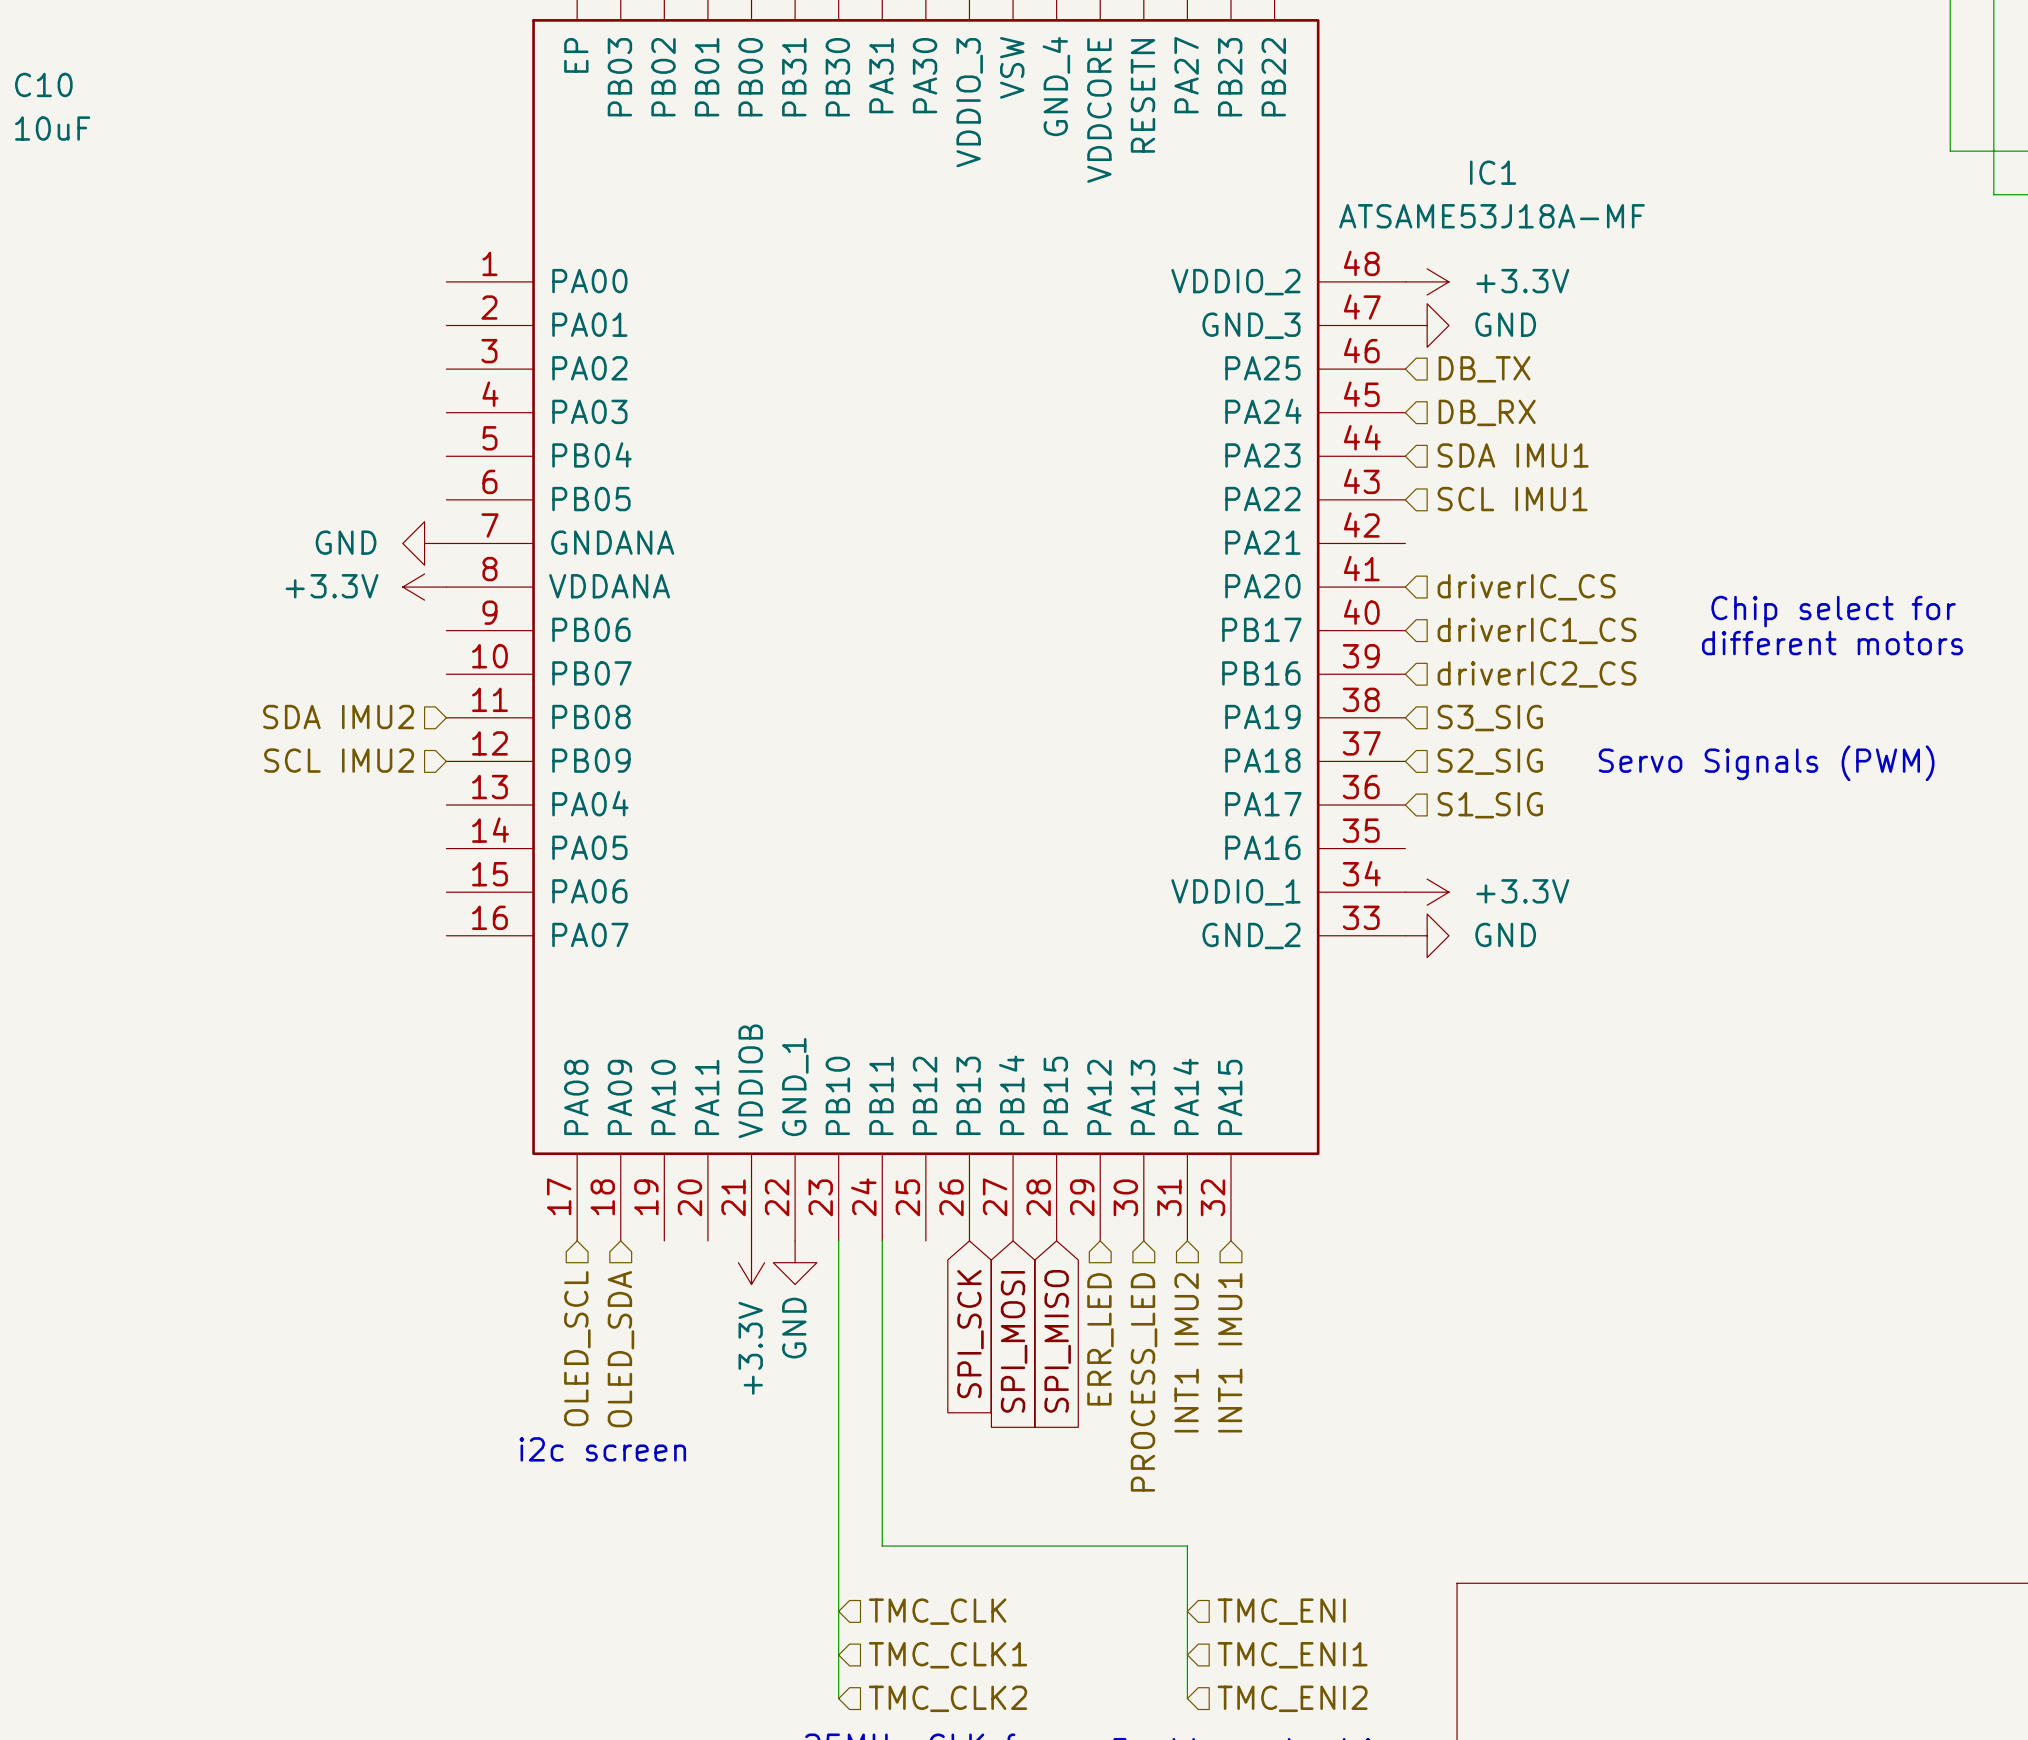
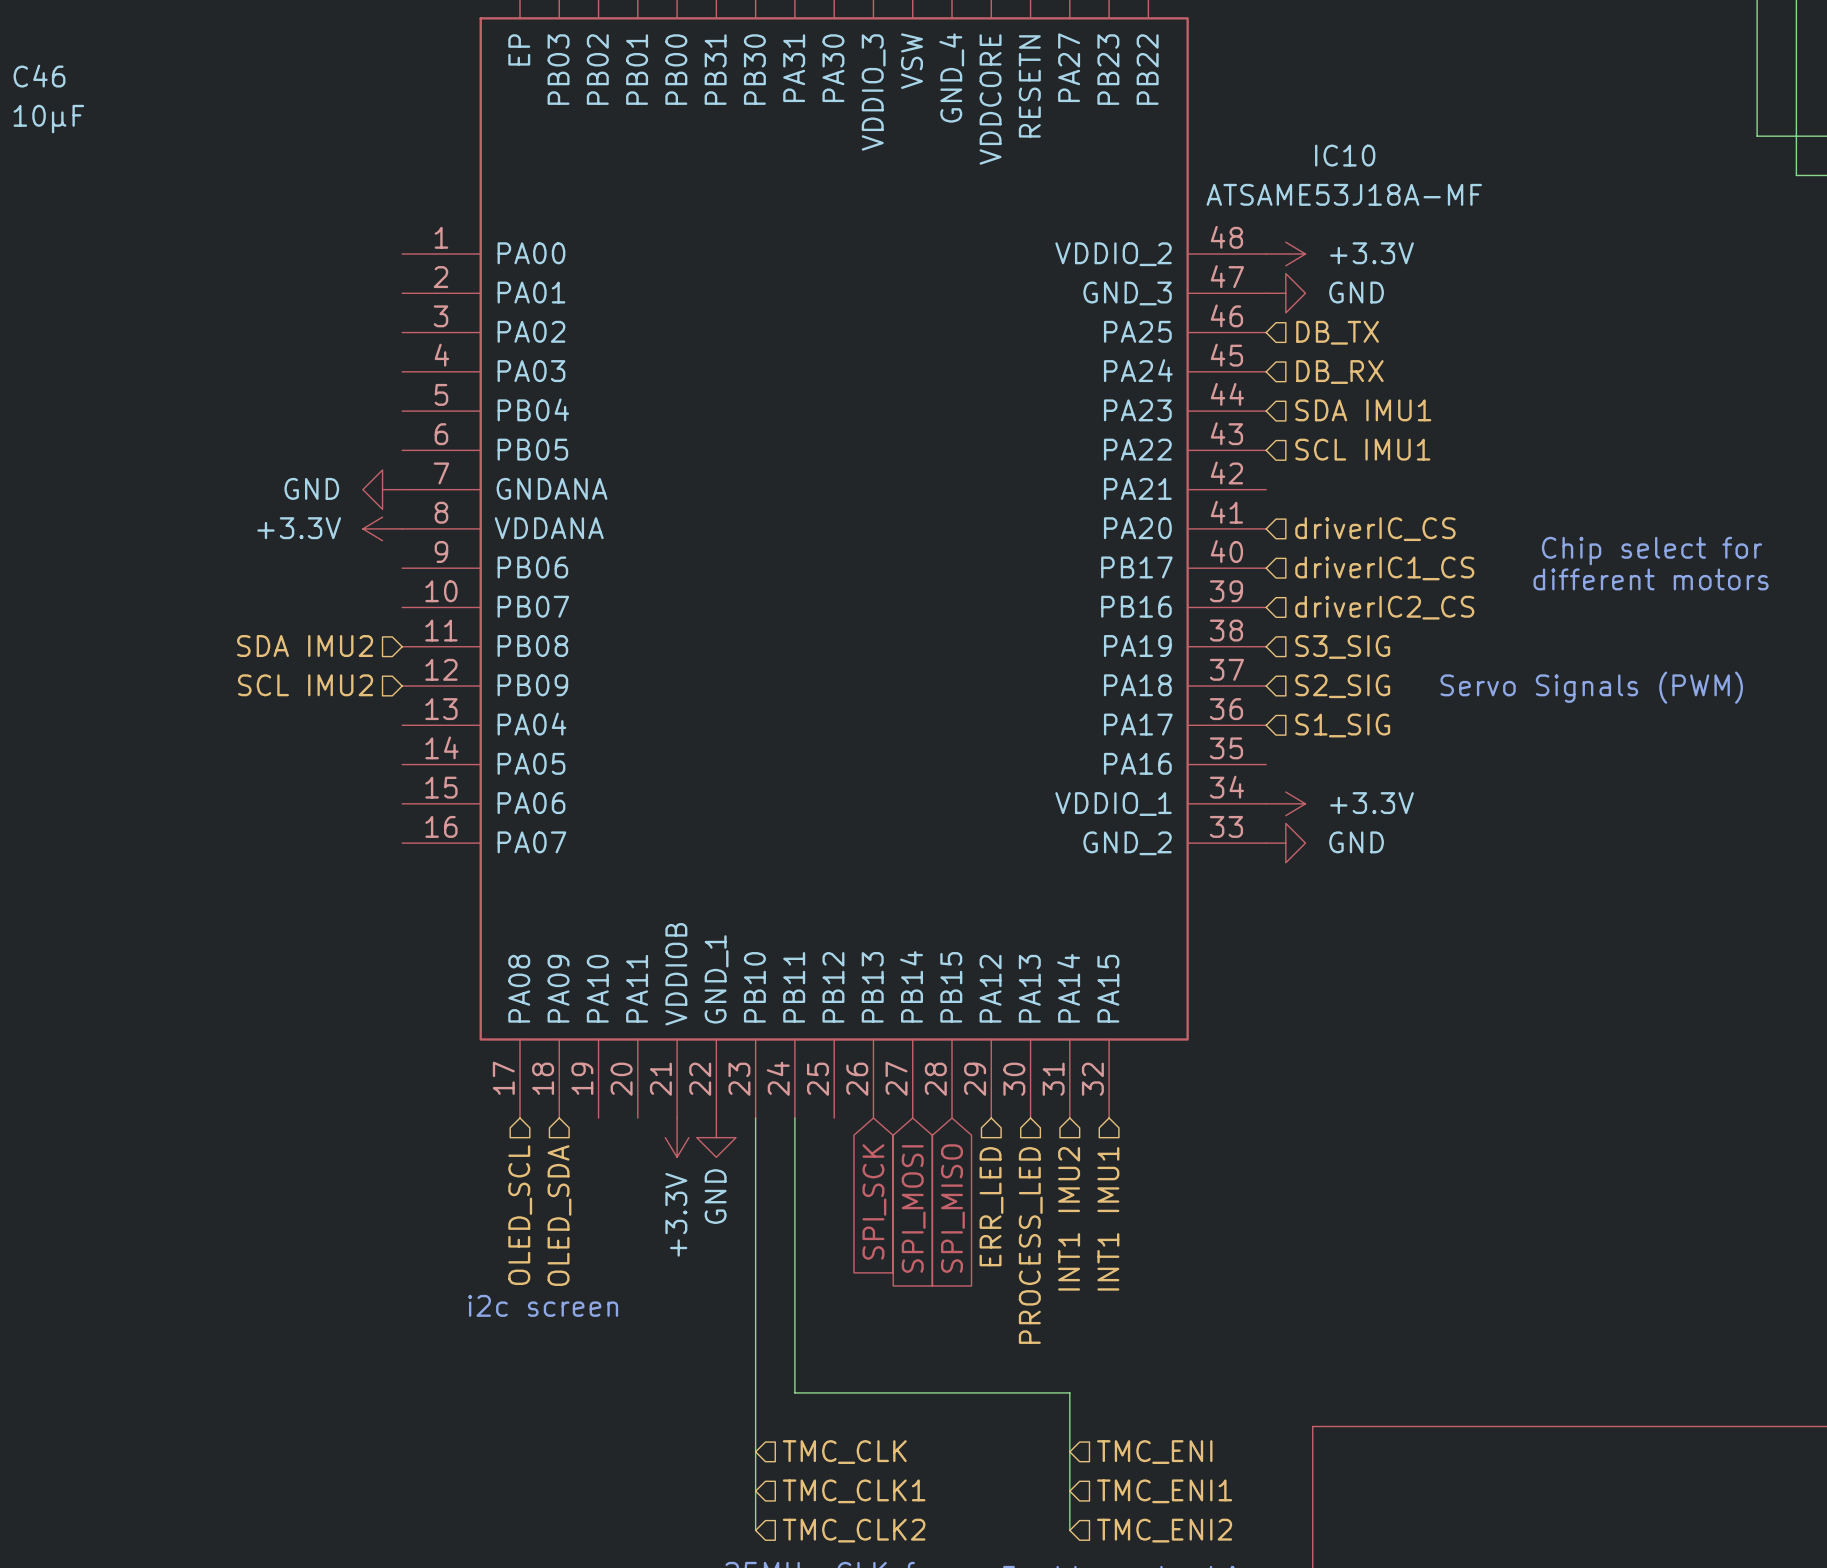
C10 name: C10 (43, 84) -> C46 (39, 76)
C10 value: 10uF (52, 128) -> 10µF (48, 119)
IC1 name: IC1 (1493, 172) -> IC10 (1345, 155)

